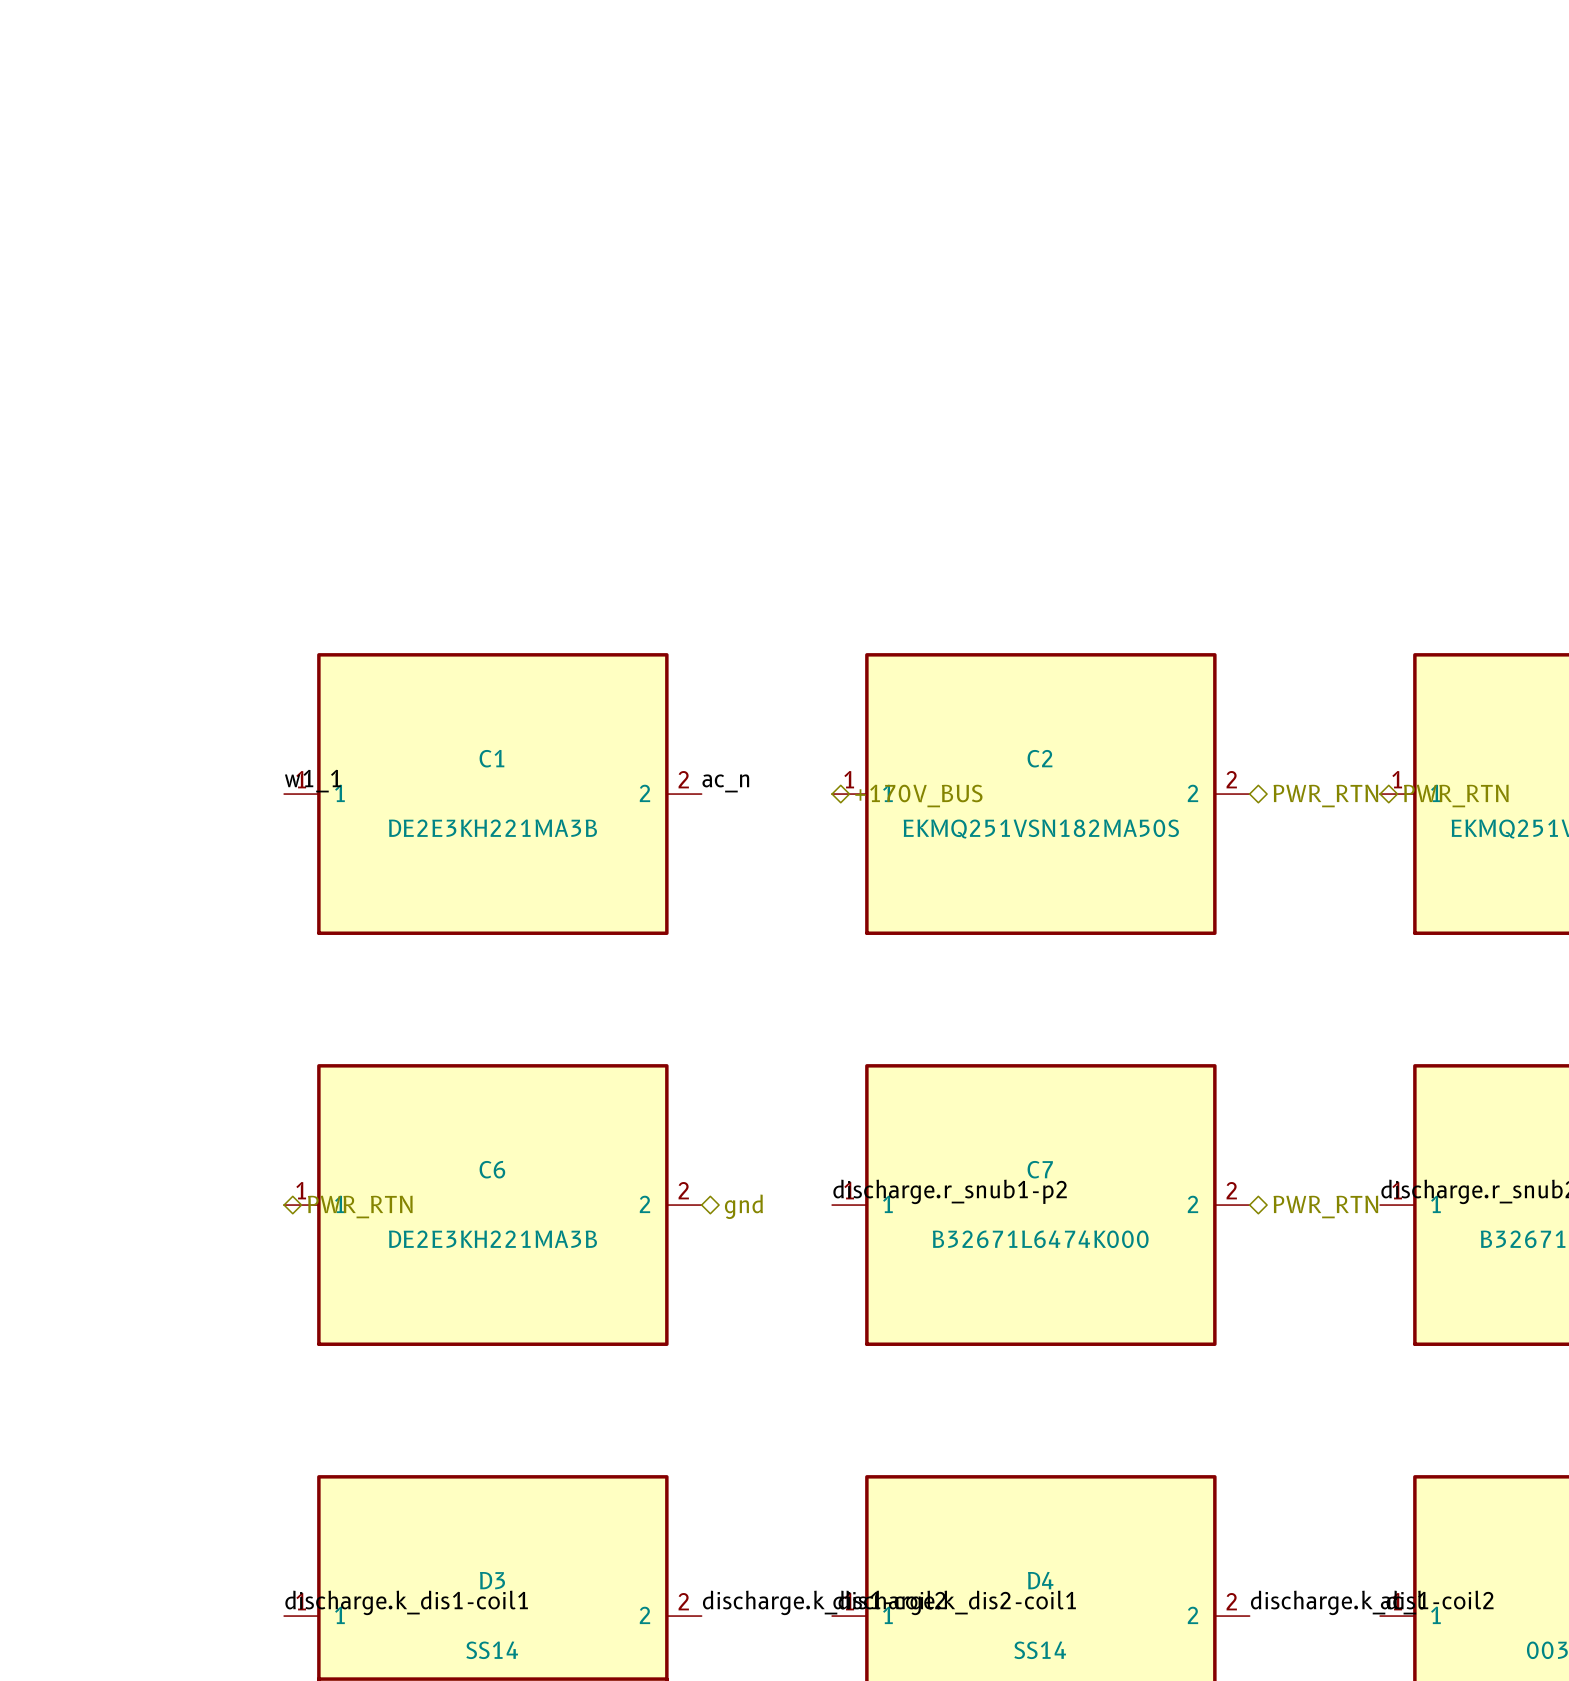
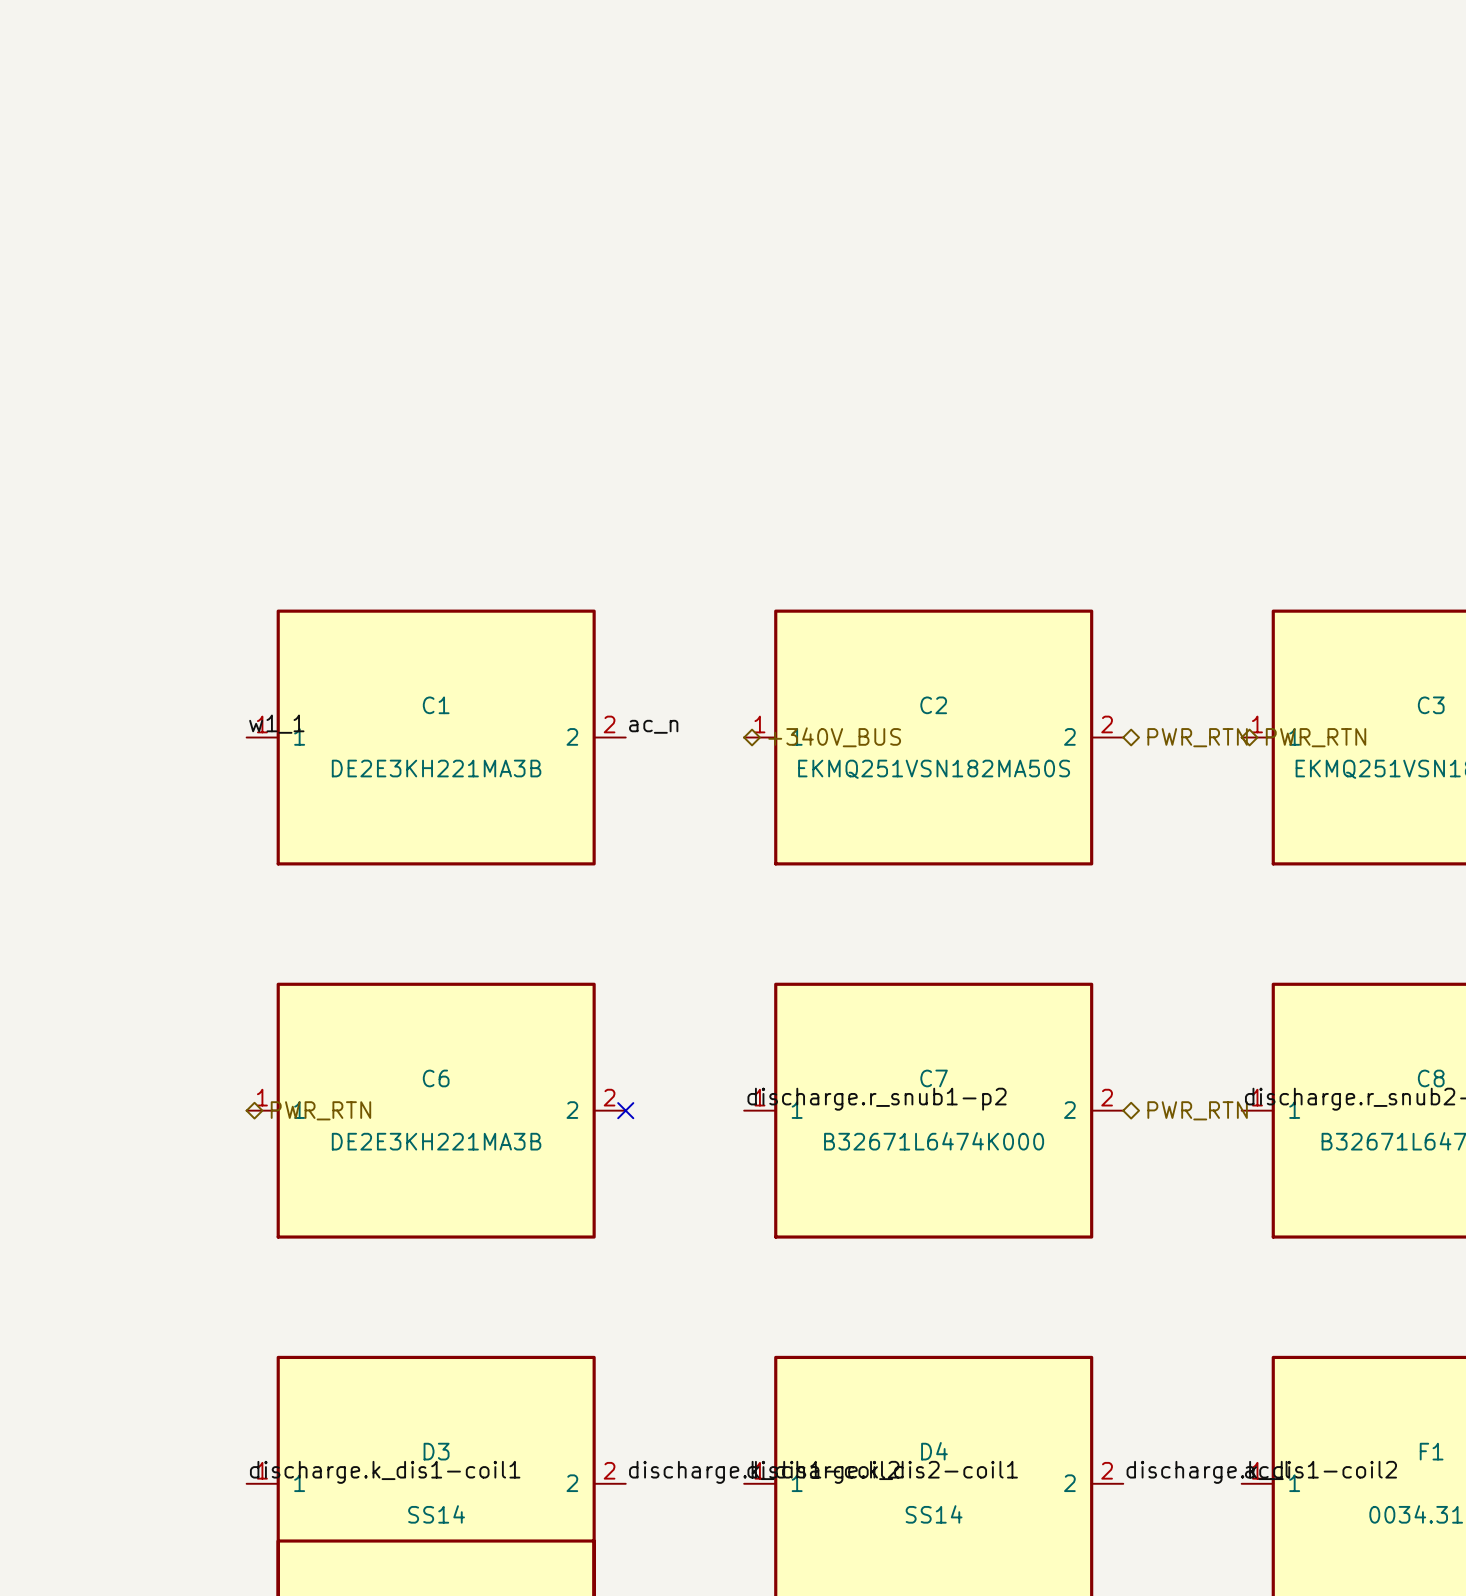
hierarchical label: +170V_BUS (918, 795) -> +340V_BUS (834, 737)
no-connect mark: none -> (625, 1110)
hierarchical label: gnd (743, 1206) -> none

